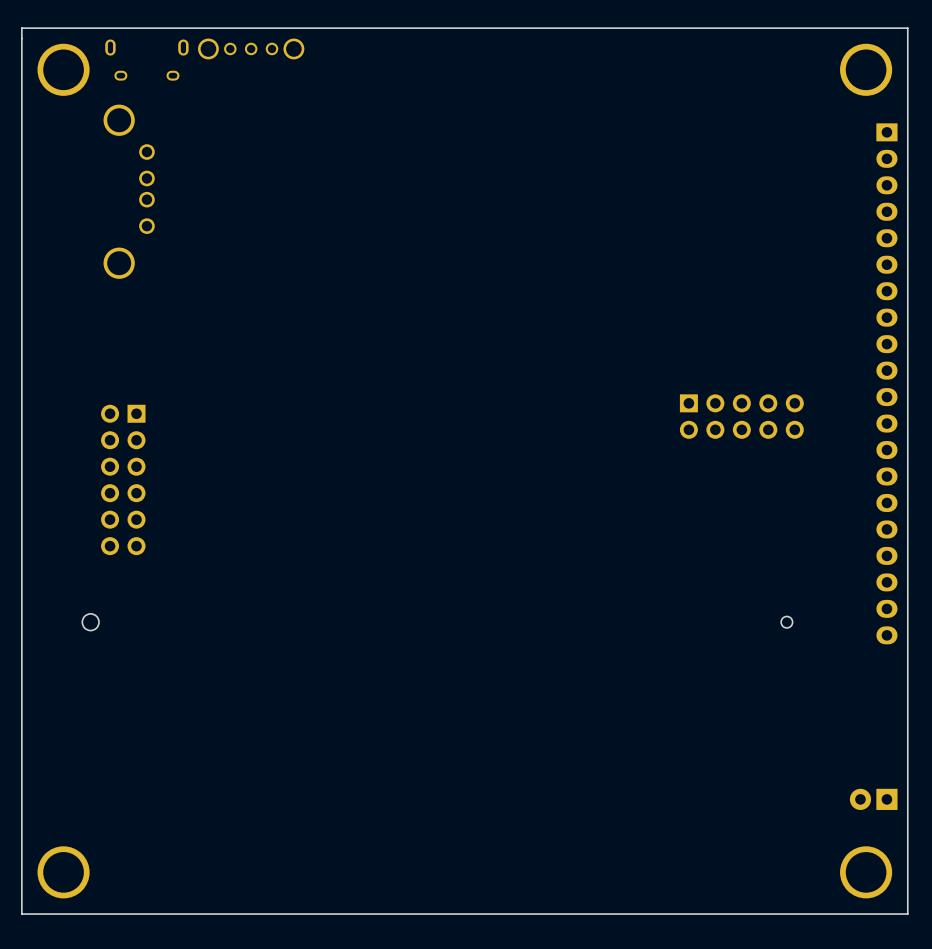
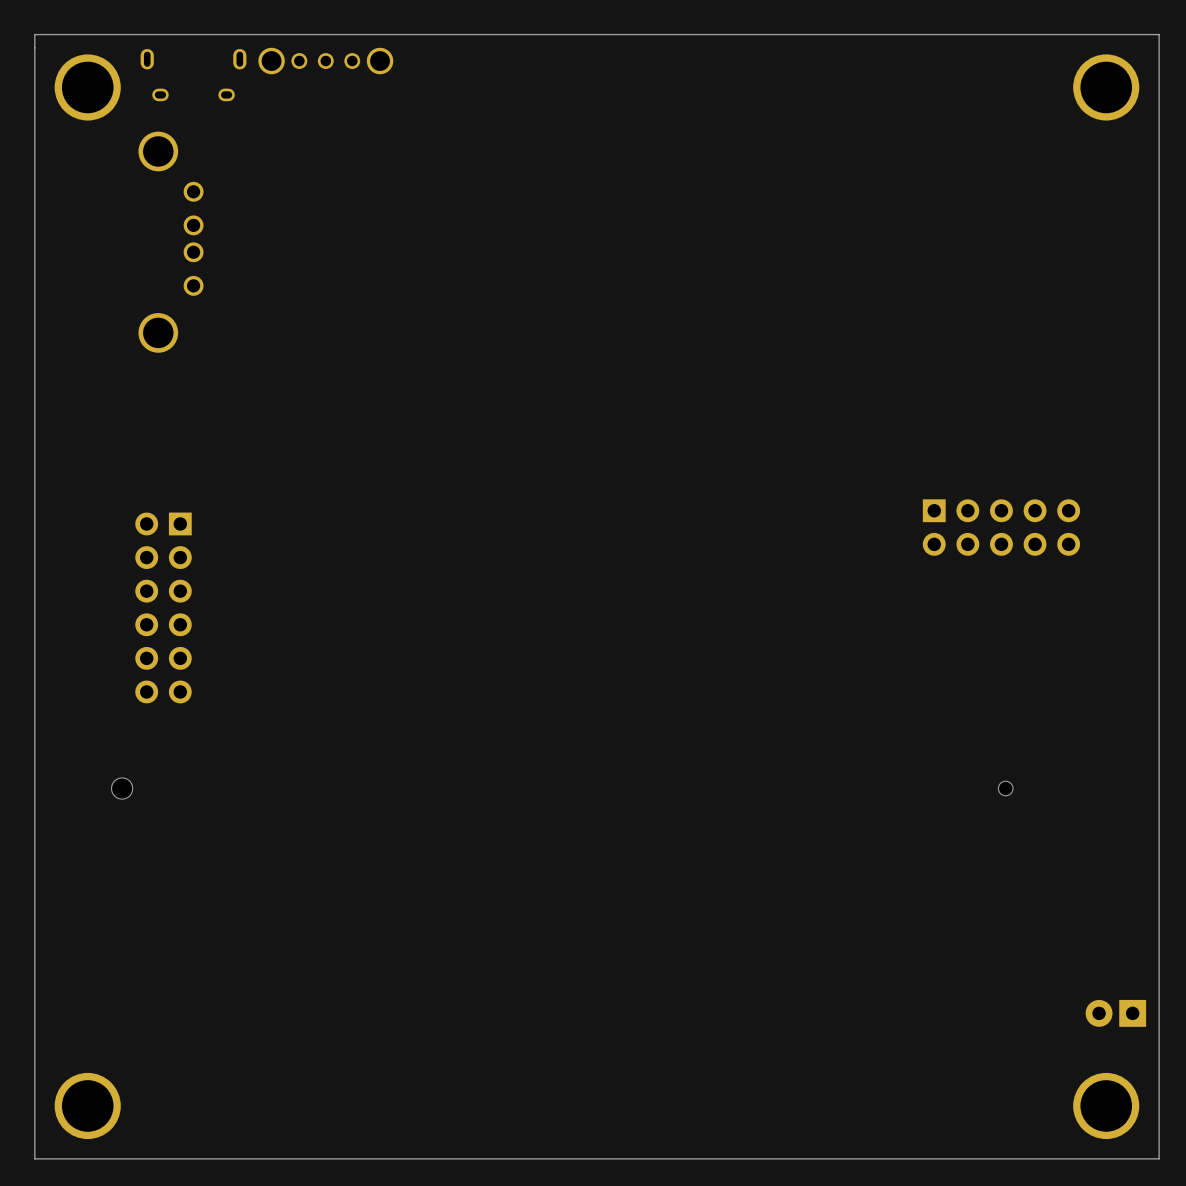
part: (886, 383) -> none
part position: (741, 416) -> (1001, 527)

